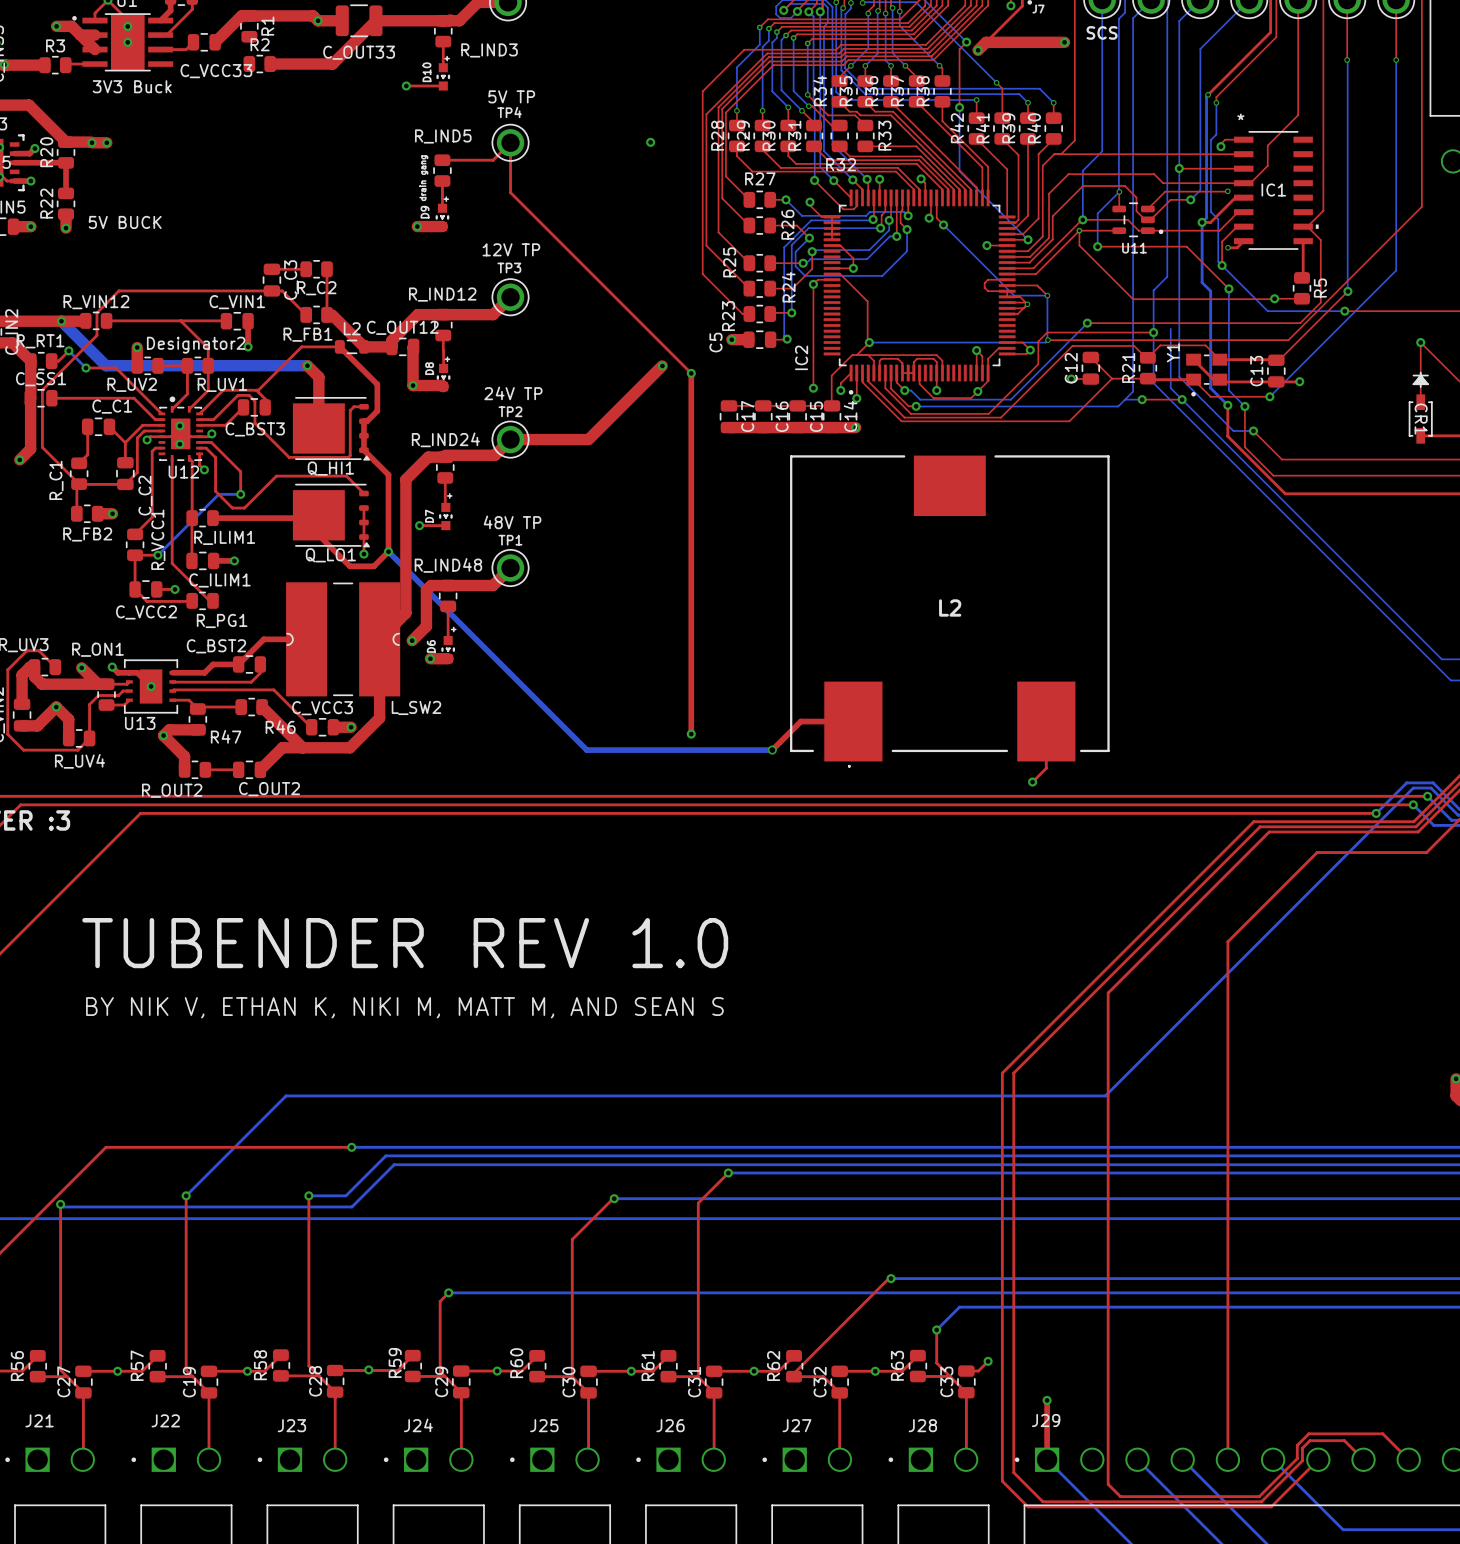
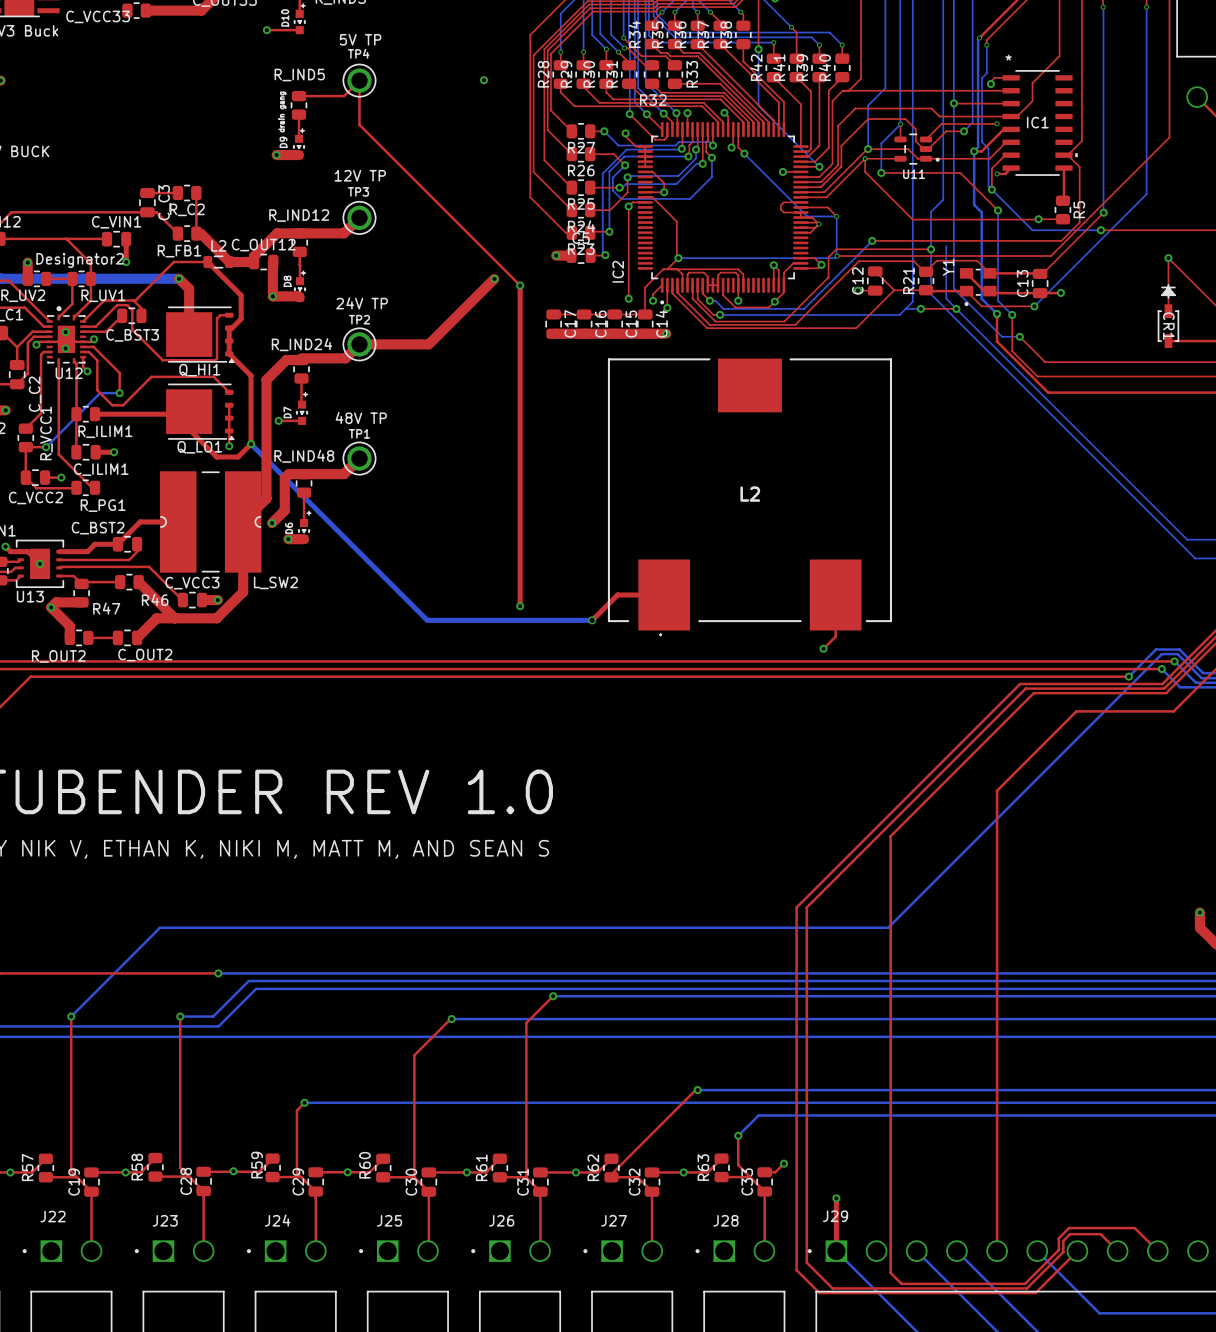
R27 name position: R27 (760, 178) -> R27 (581, 147)
R26 name rotation: 0° (787, 224) -> 90° clockwise (581, 170)
R25 name rotation: 0° (729, 262) -> 90° clockwise (581, 204)
R24 name rotation: 0° (788, 287) -> 90° clockwise (581, 226)
R23 name rotation: 0° (728, 316) -> 90° clockwise (581, 249)
C5 name rotation: 0° (715, 342) -> 90° clockwise (581, 238)
C5 name position: C5 (715, 342) -> C5 (581, 238)

